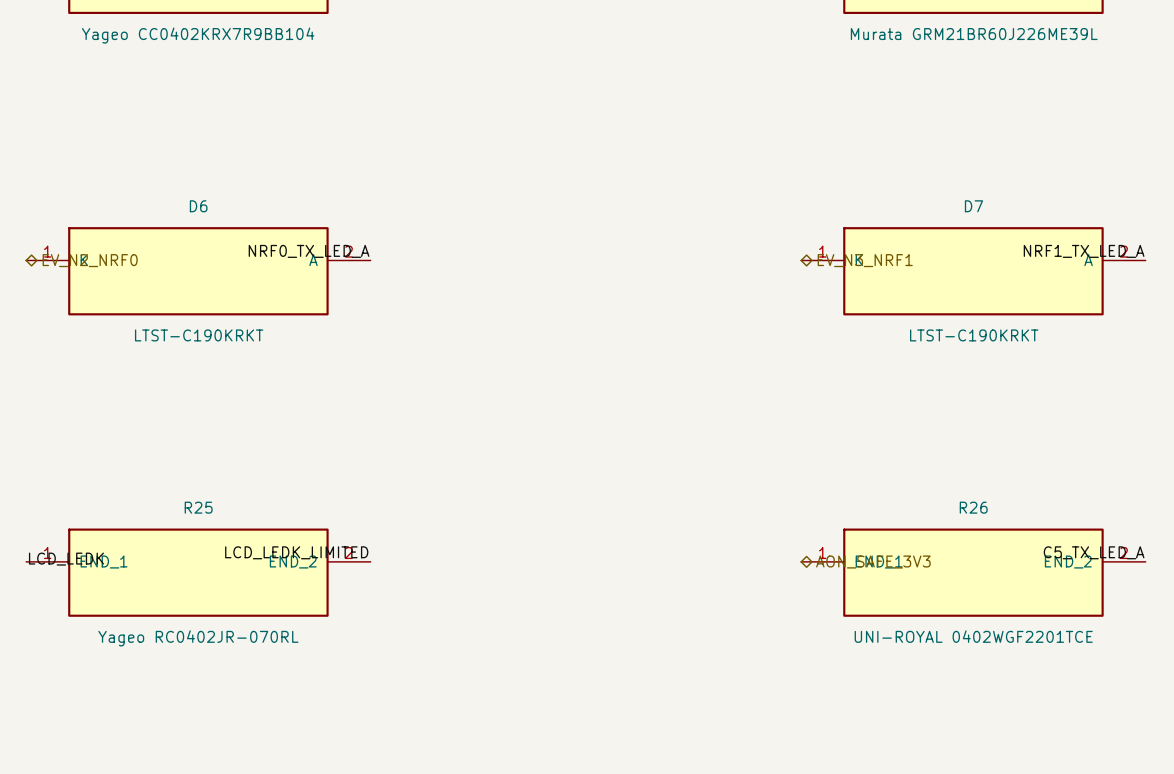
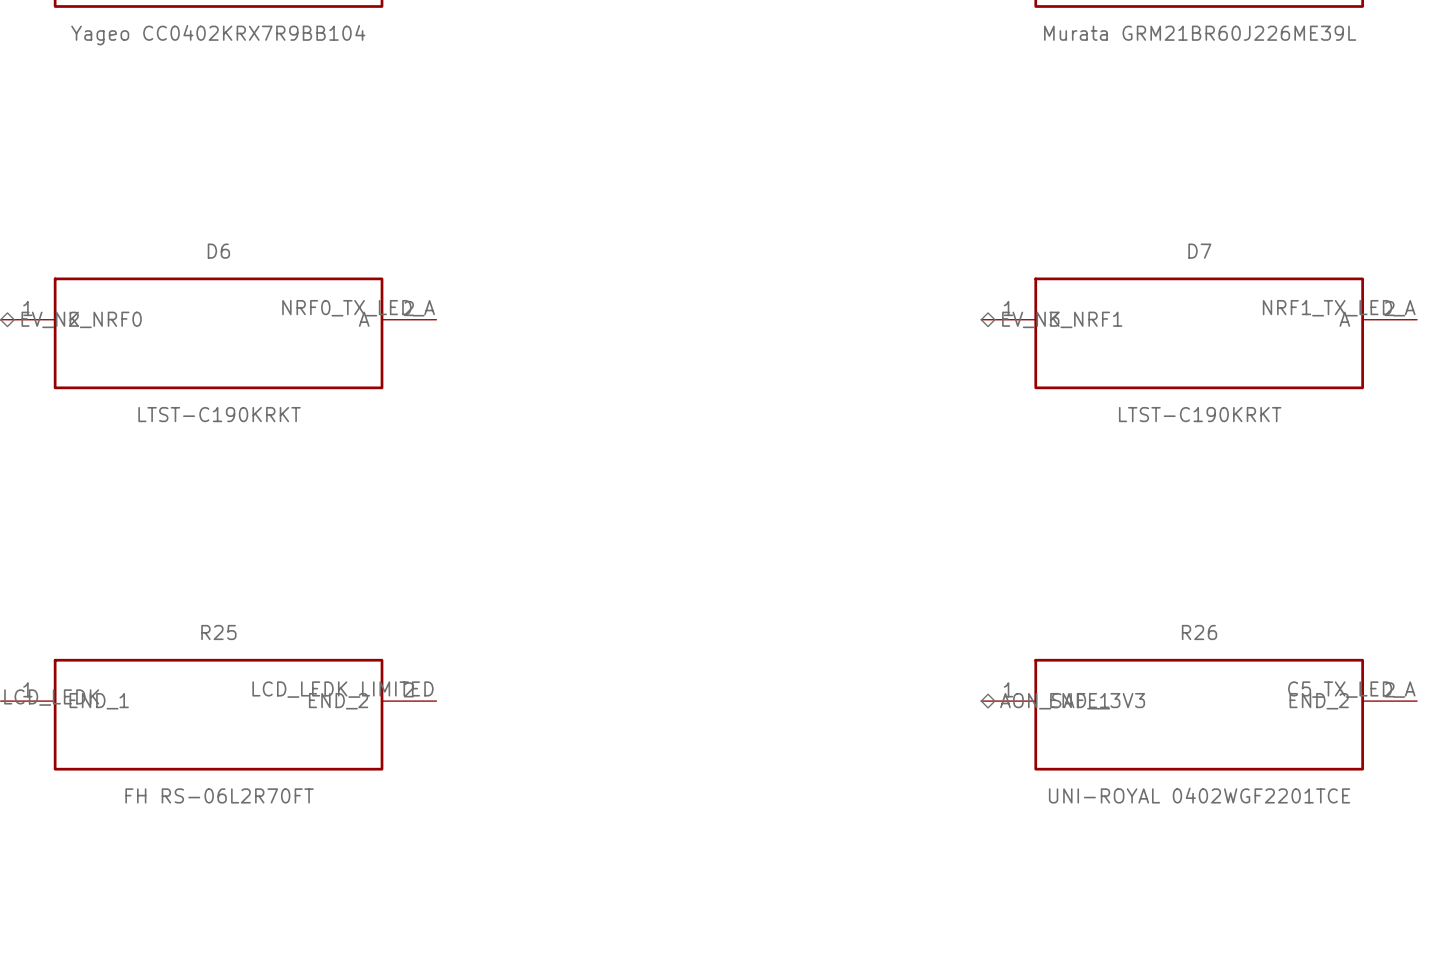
R25 value: Yageo RC0402JR-070RL (198, 638) -> FH RS-06L2R70FT (219, 795)

